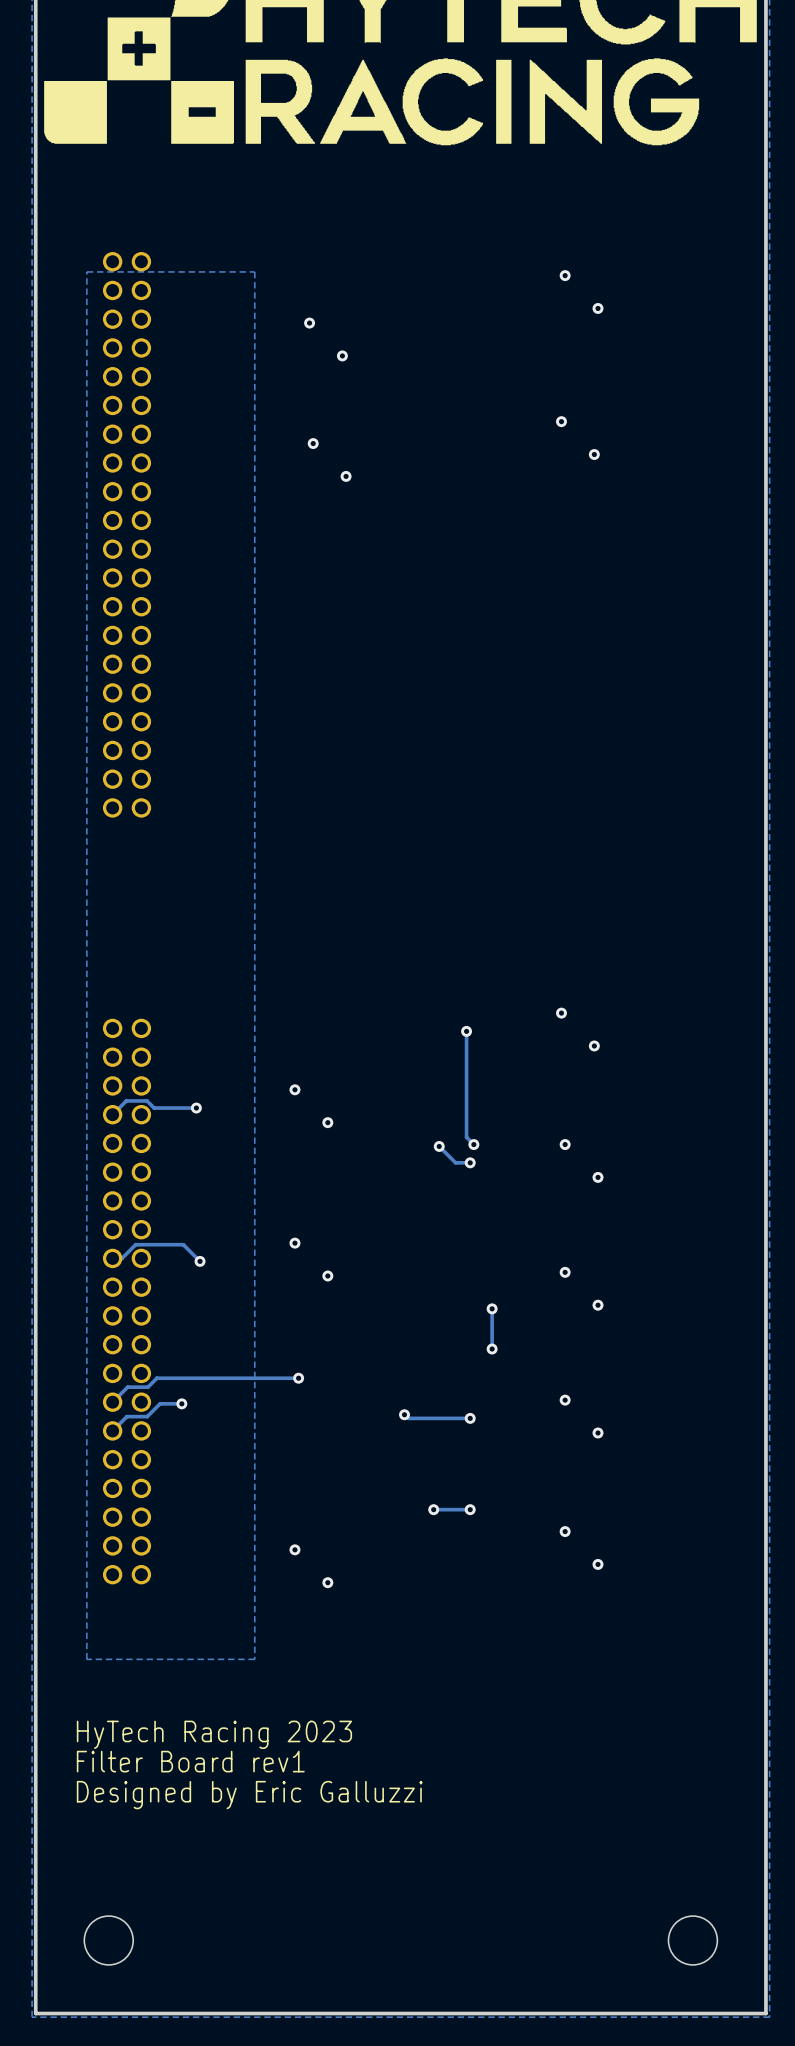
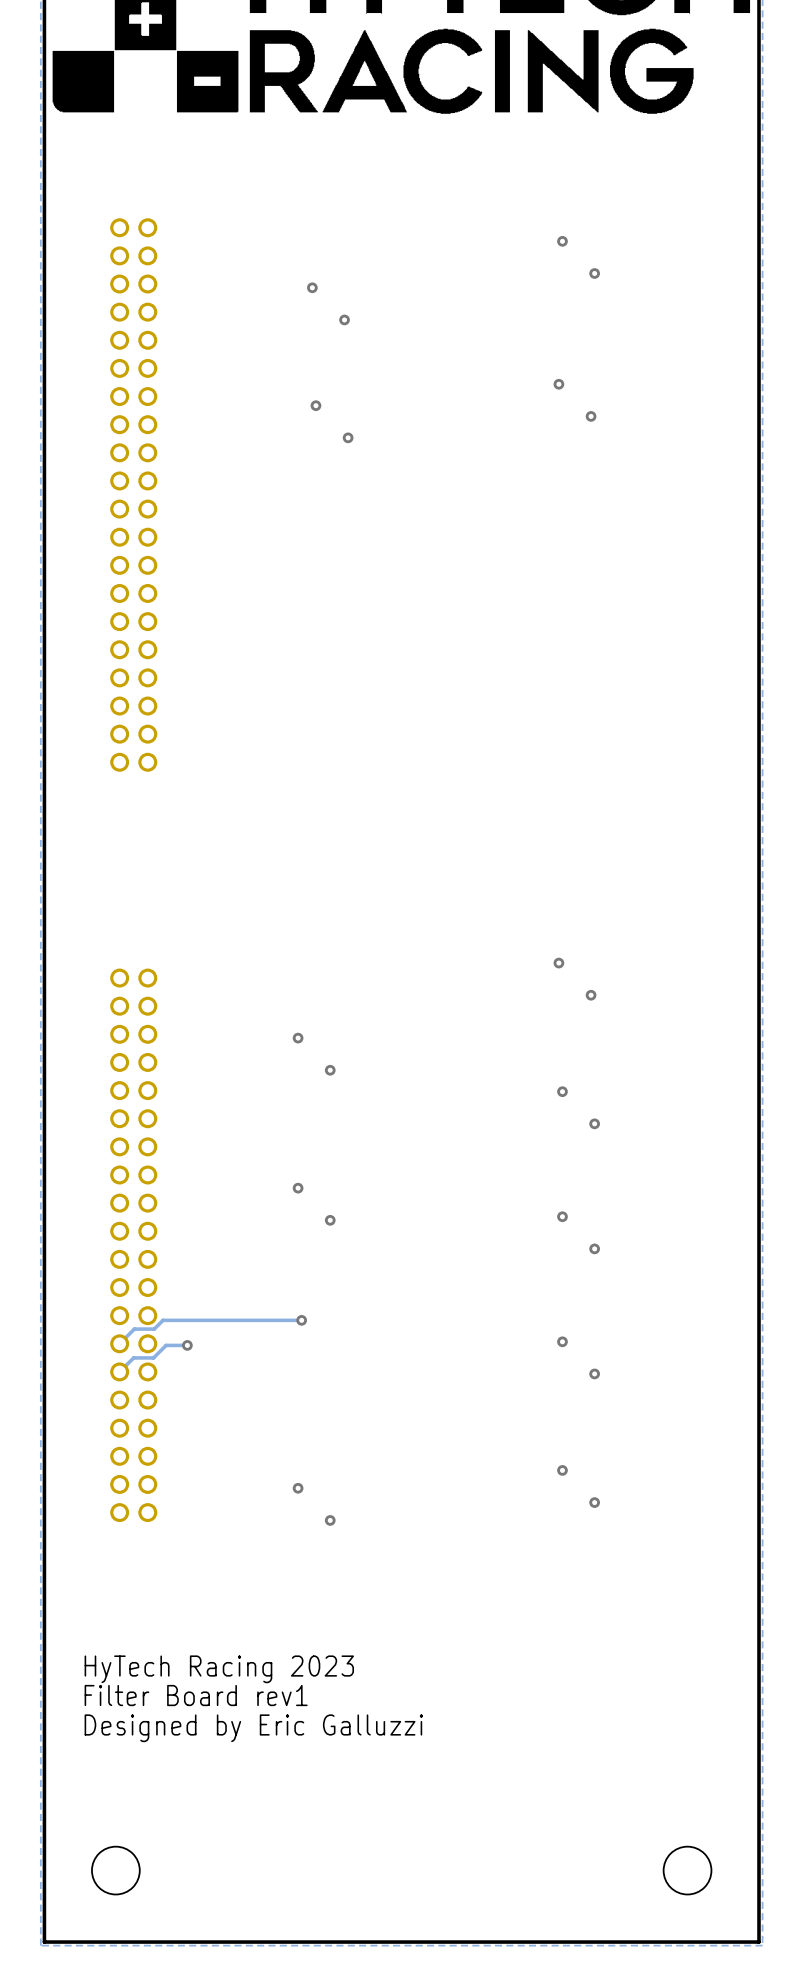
zone outline: (254, 271) (86, 271) (86, 1659) (254, 1659) (254, 271) -> none
track: (466, 1031) (466, 1137) (473, 1144) -> none
via: (466, 1031) -> none
track: (196, 1108) (154, 1108) (147, 1100) (126, 1100) (112, 1114) -> none
via: (196, 1108) -> none
via: (473, 1144) -> none
track: (439, 1146) (455, 1162) (470, 1162) -> none
via: (439, 1146) -> none
via: (470, 1162) -> none
track: (112, 1258) (121, 1258) (135, 1244) (183, 1244) (200, 1261) -> none
via: (200, 1261) -> none
track: (492, 1308) (492, 1349) -> none
via: (492, 1308) -> none
via: (492, 1349) -> none
track: (404, 1414) (408, 1418) (470, 1418) -> none
via: (404, 1414) -> none
via: (470, 1418) -> none
via: (433, 1509) -> none
track: (470, 1509) (433, 1509) -> none
via: (470, 1509) -> none

